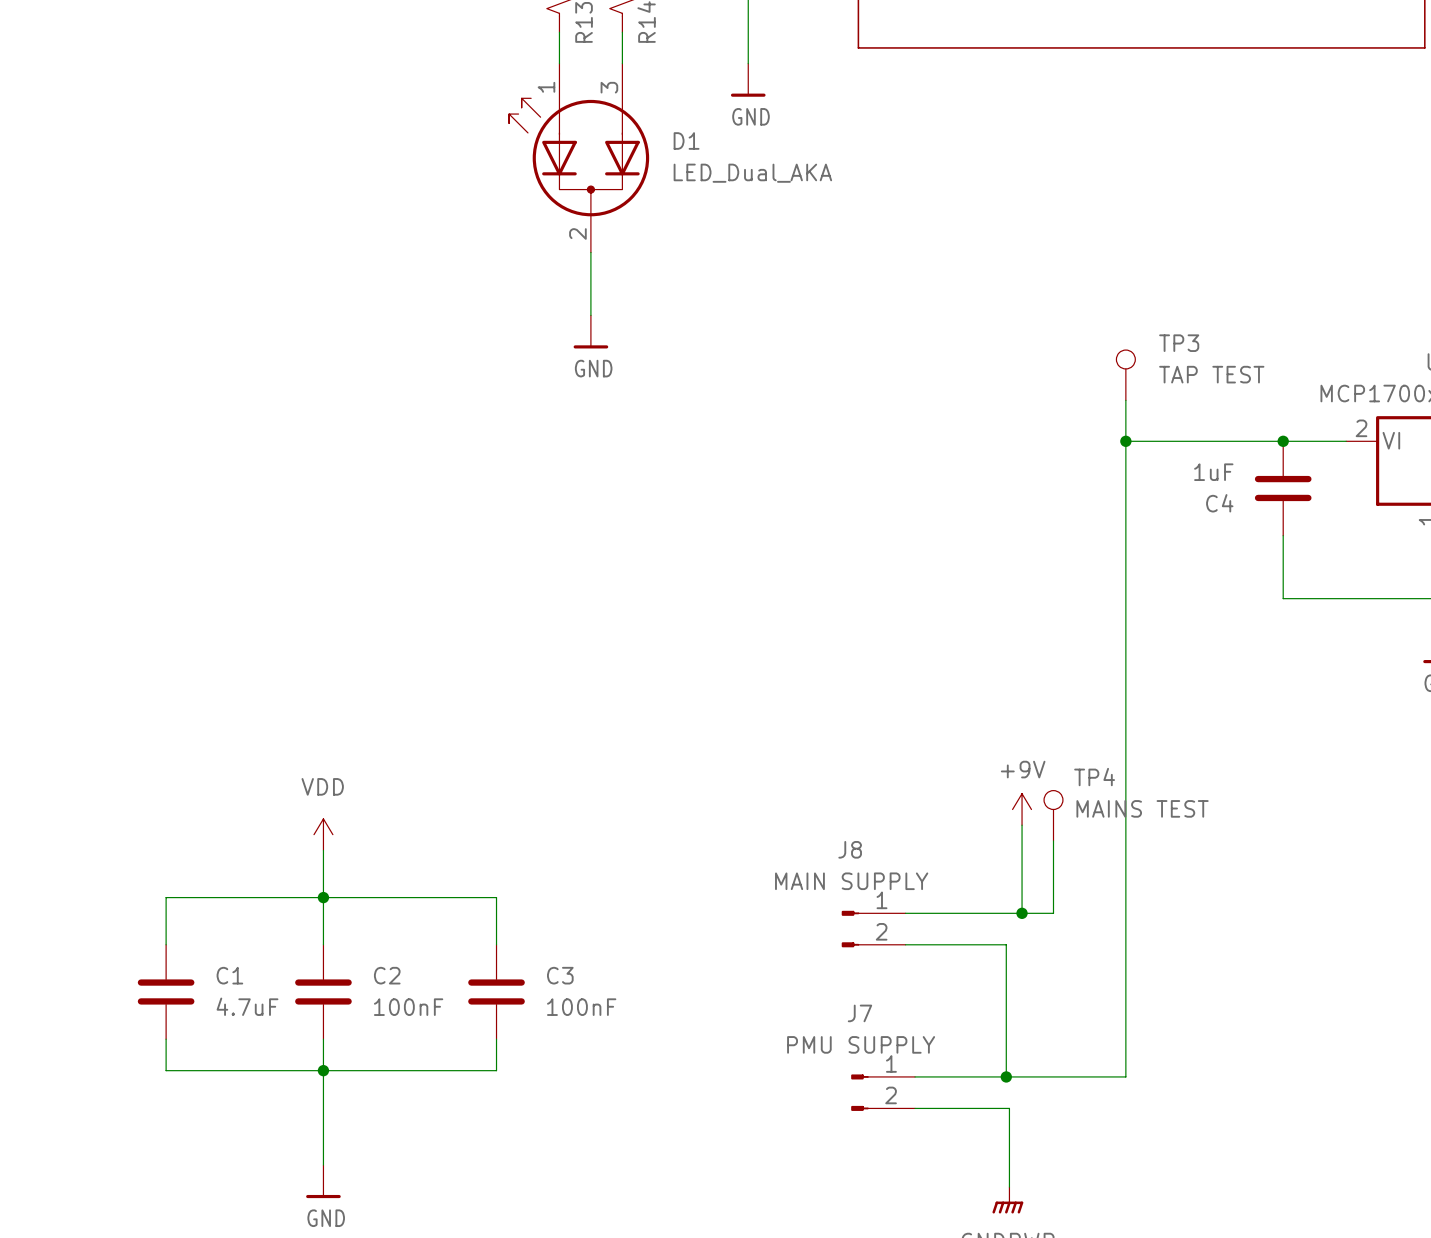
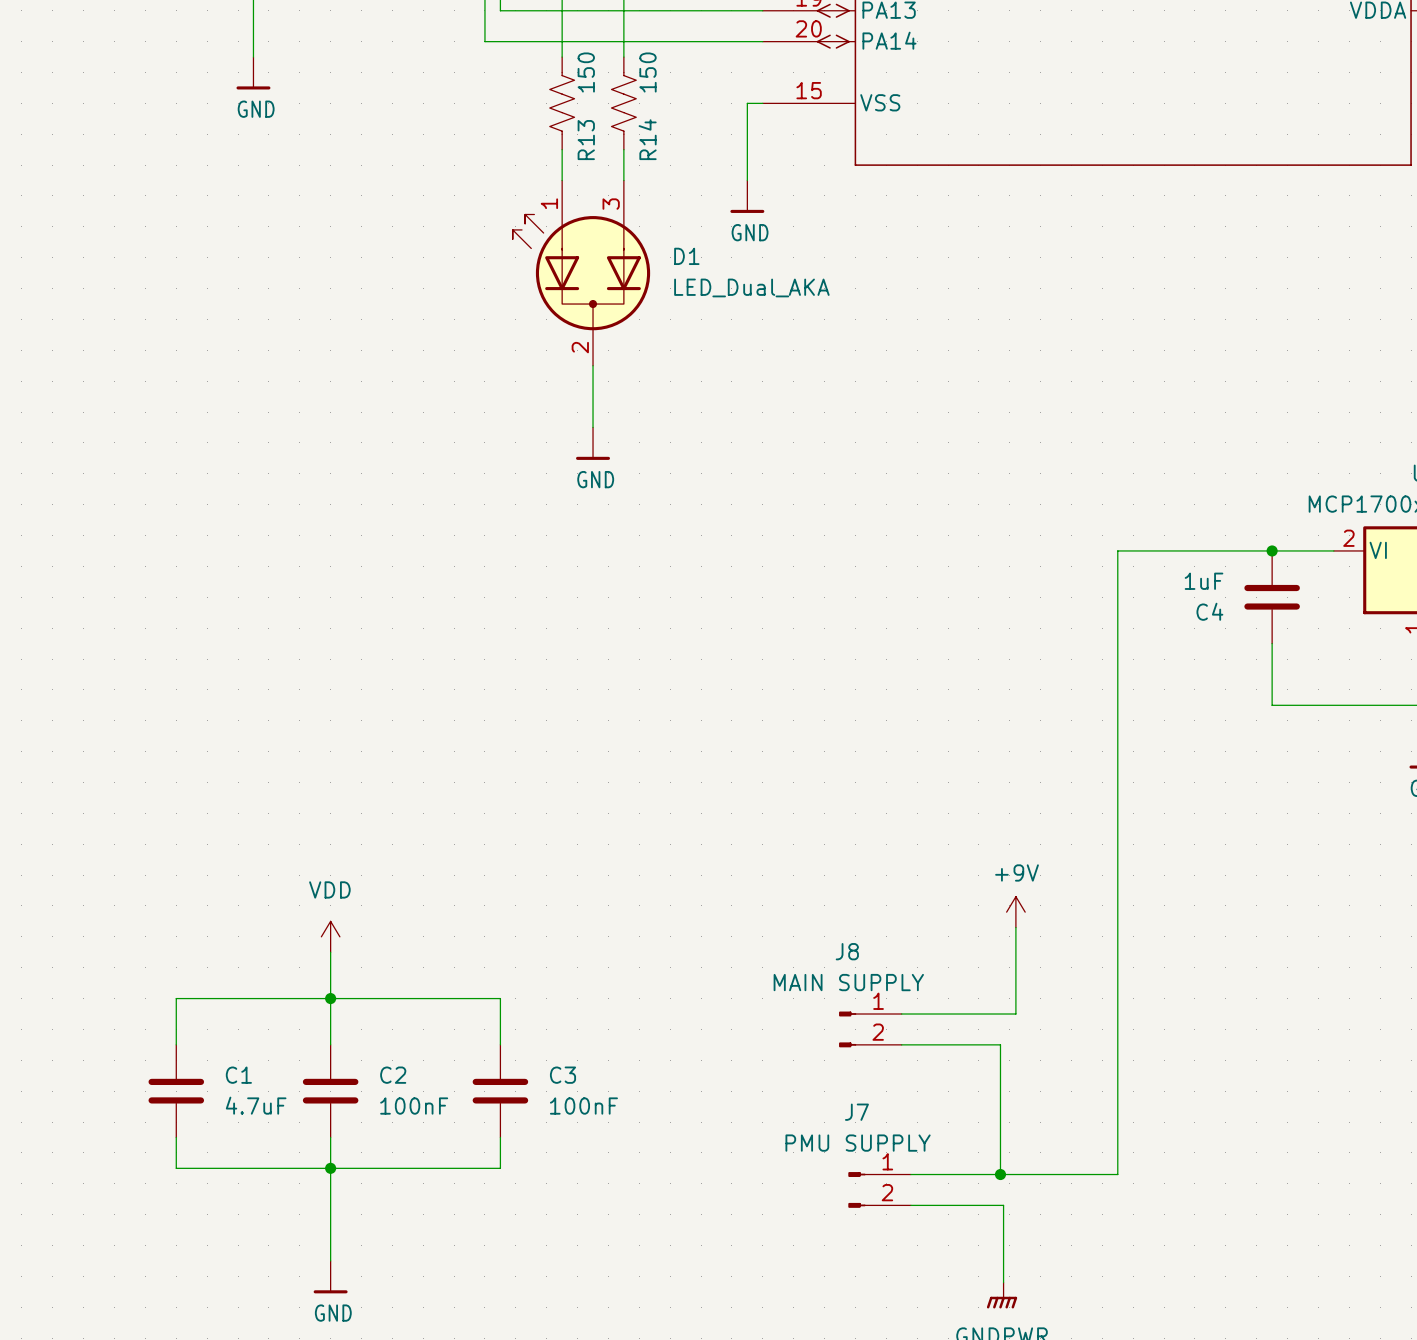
TP3: TAP TEST (1125, 375) -> none
wire: (1125, 400) (1125, 441) -> none
junction: (1125, 441) -> none
TP4: MAINS TEST (1053, 815) -> none
wire: (1053, 840) (1053, 913) (1022, 913) -> none
junction: (1022, 913) -> none

